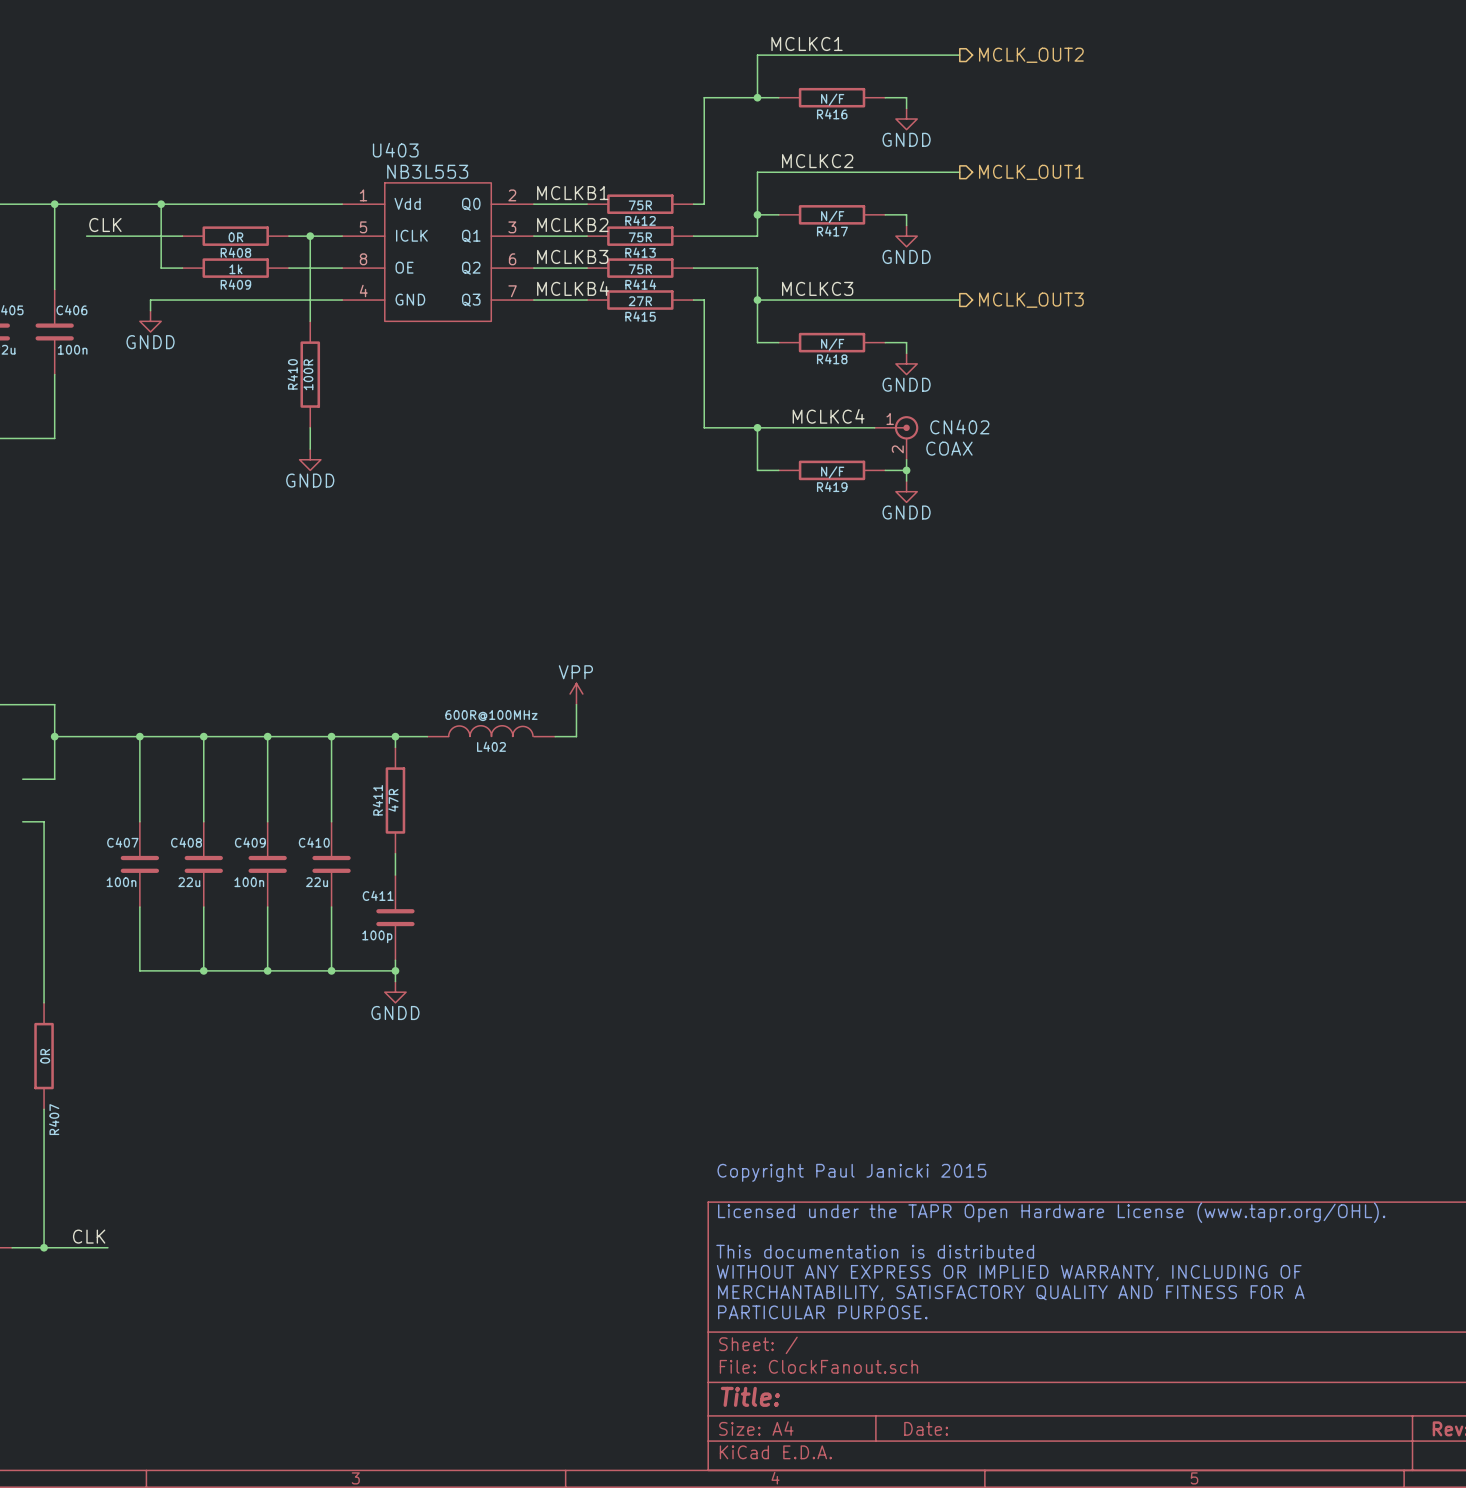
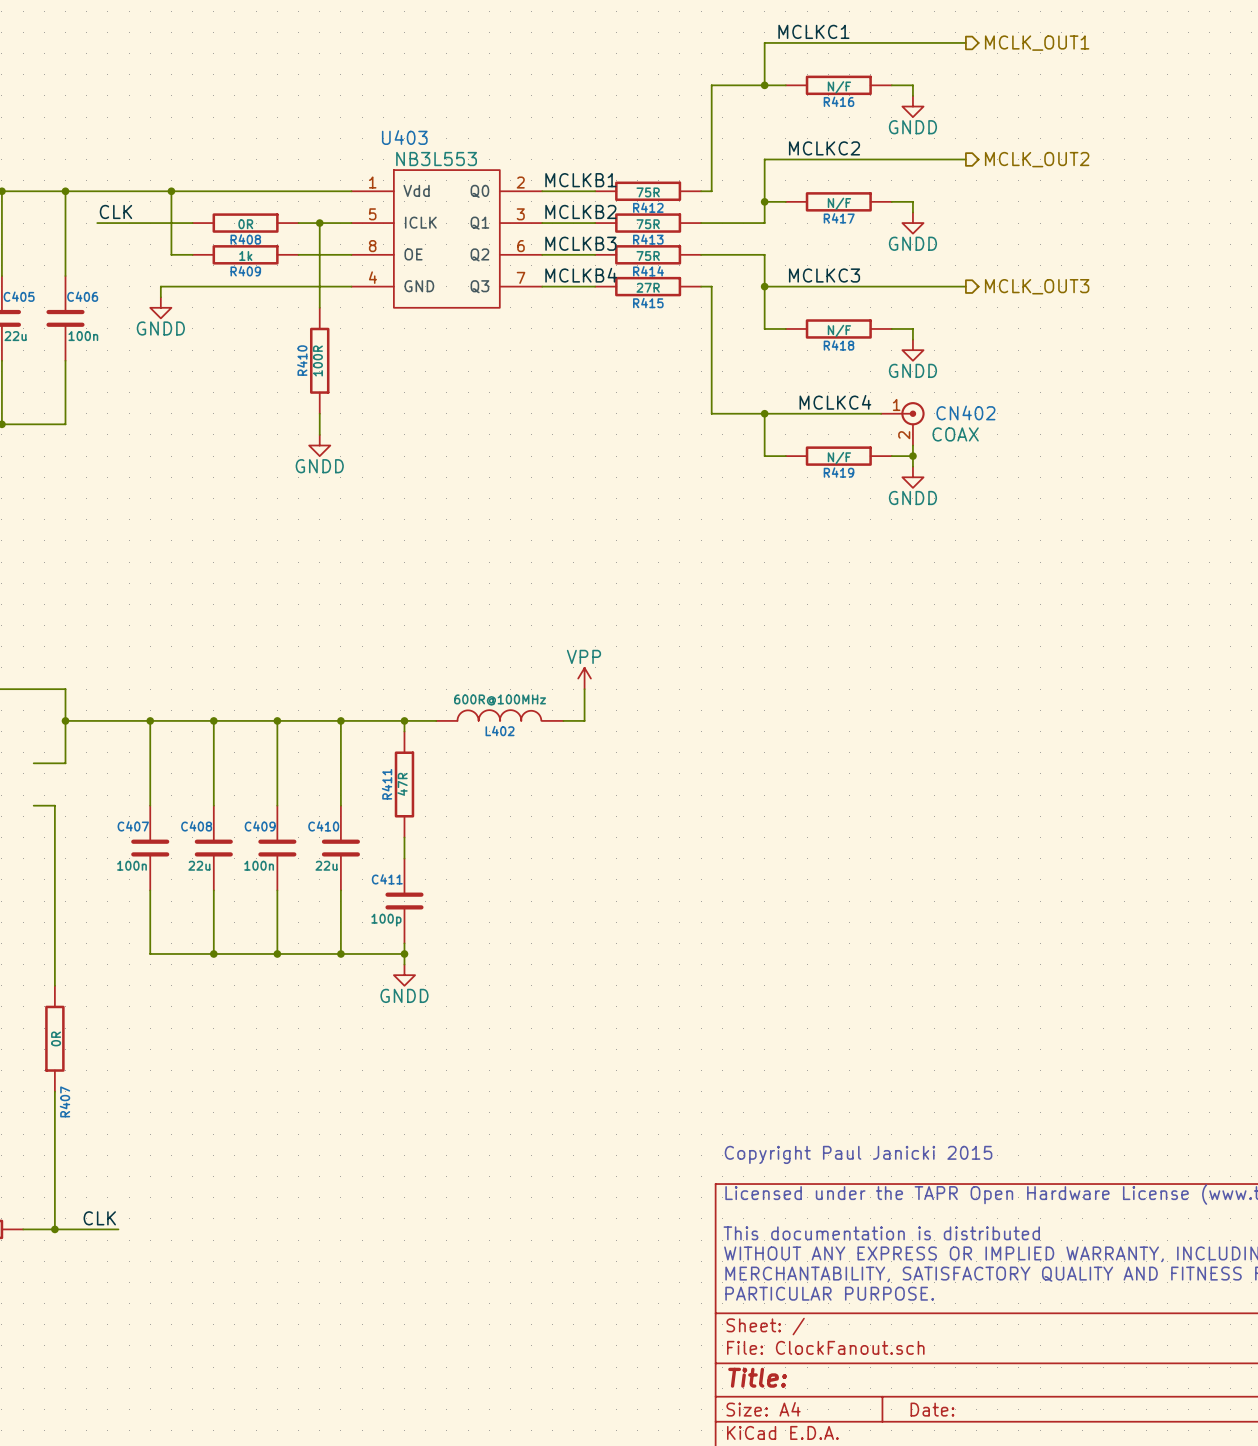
hierarchical label: MCLK_OUT2 (1031, 55) -> MCLK_OUT1 (1037, 43)
hierarchical label: MCLK_OUT1 (1031, 172) -> MCLK_OUT2 (1037, 159)

